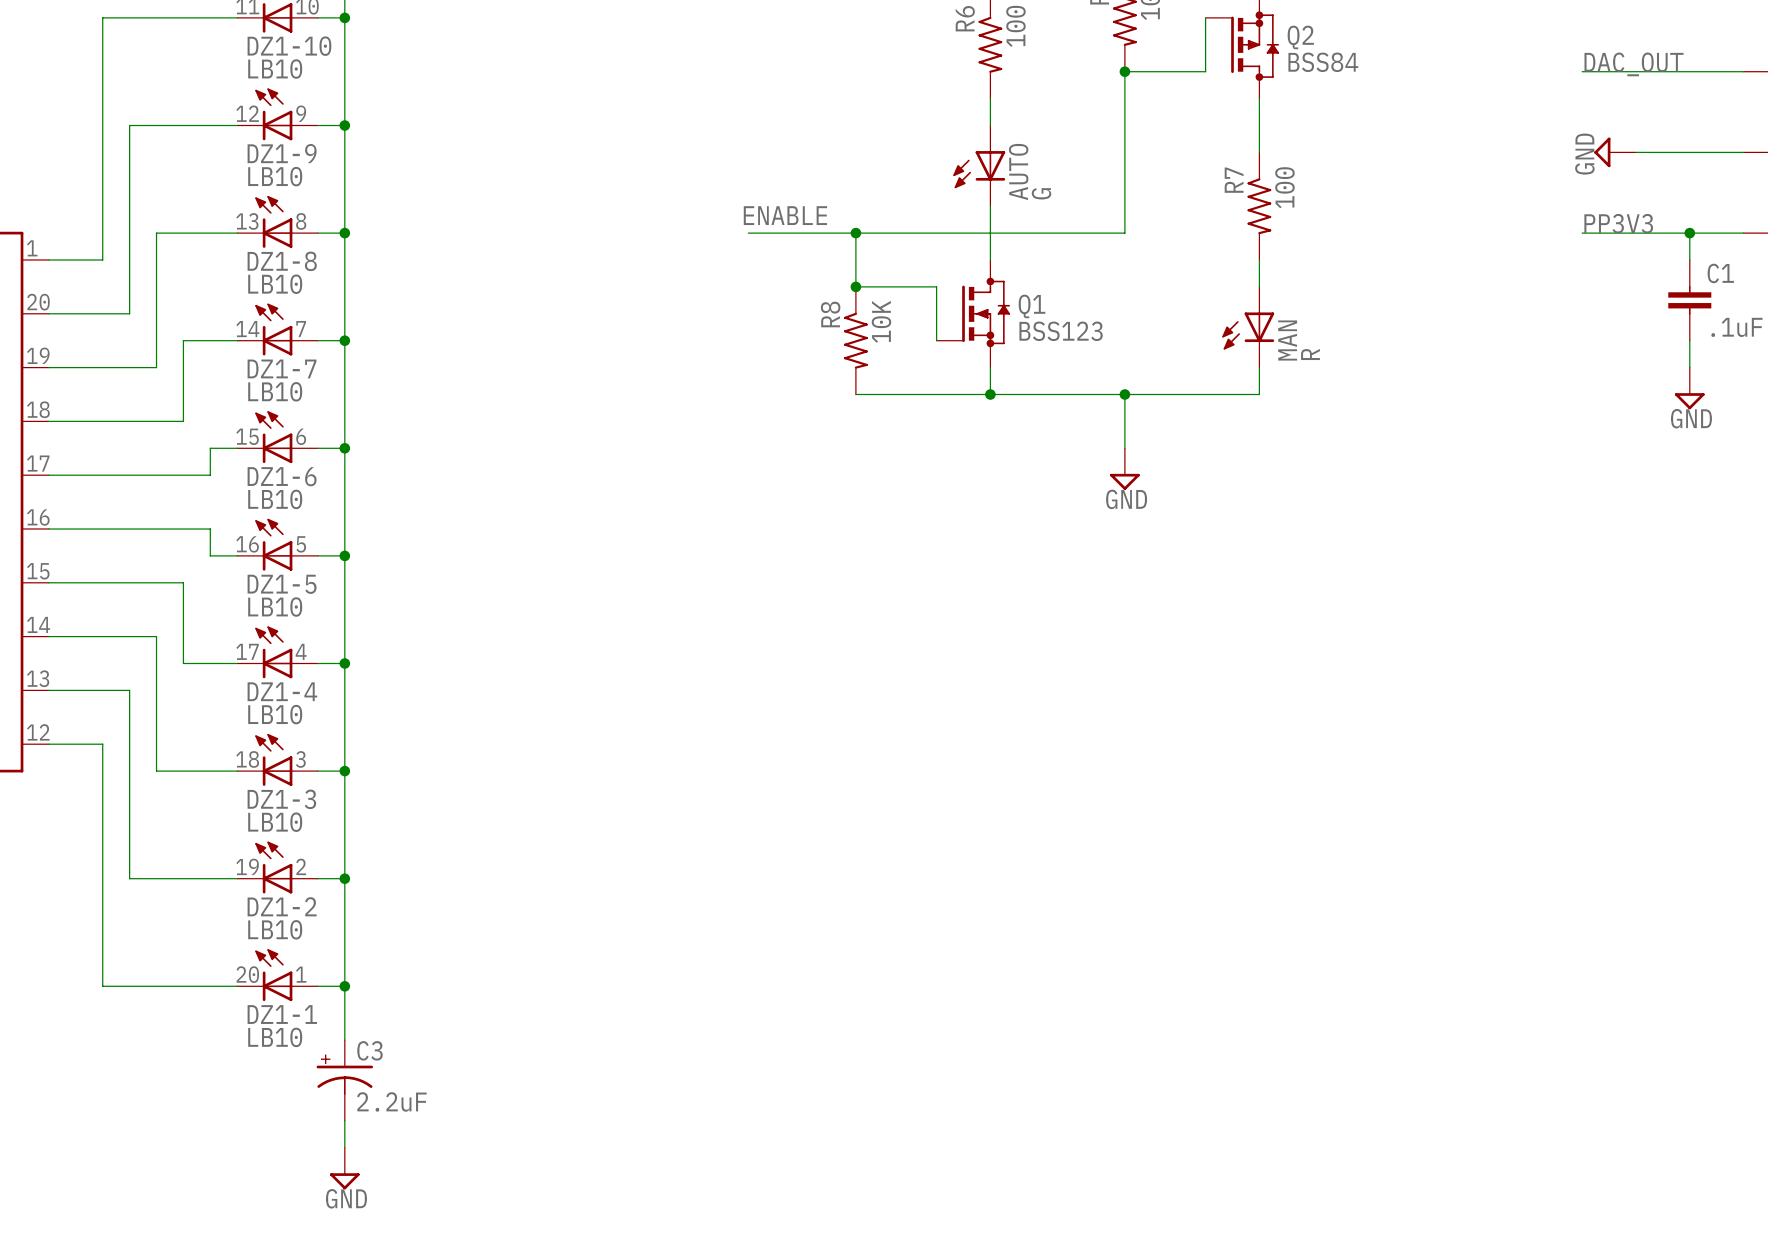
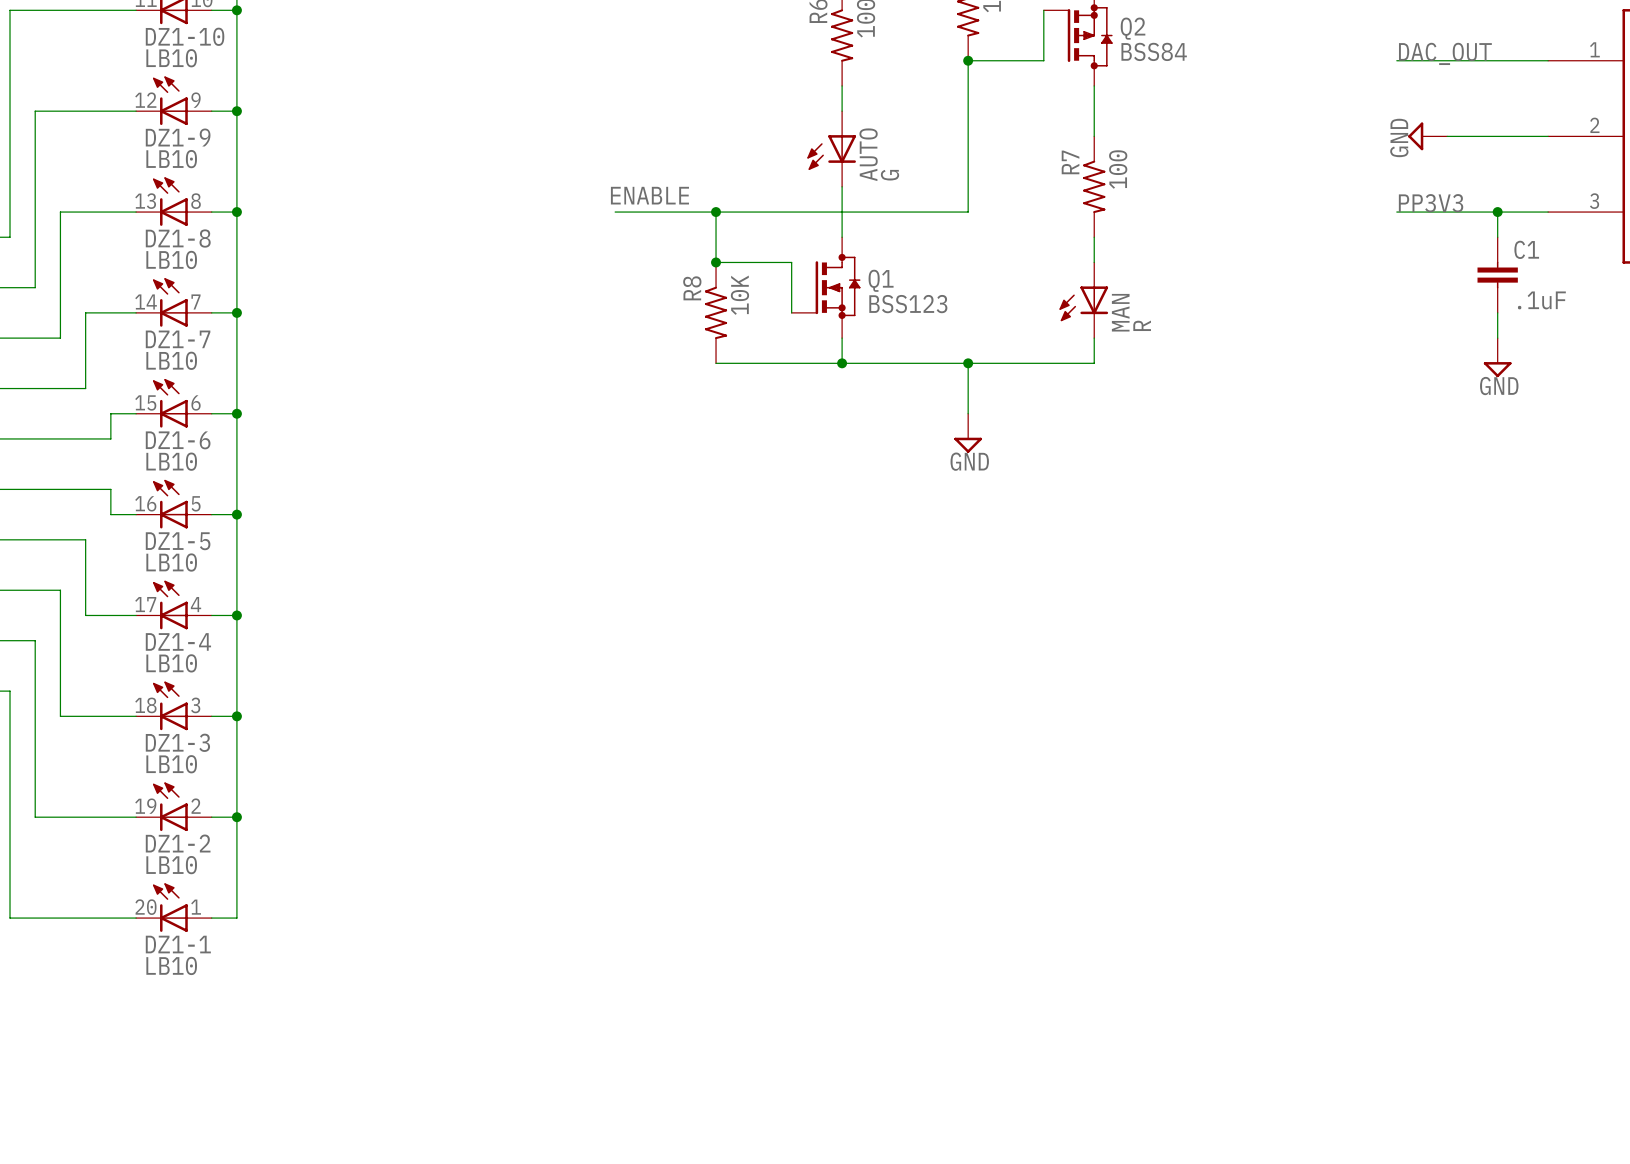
wire: (344, 986) (344, 1040) -> none
junction: (344, 986) -> none
C3: 2.2uF (344, 1080) -> none
wire: (344, 1120) (344, 1147) -> none
power symbol: GND (344, 1168) -> none

